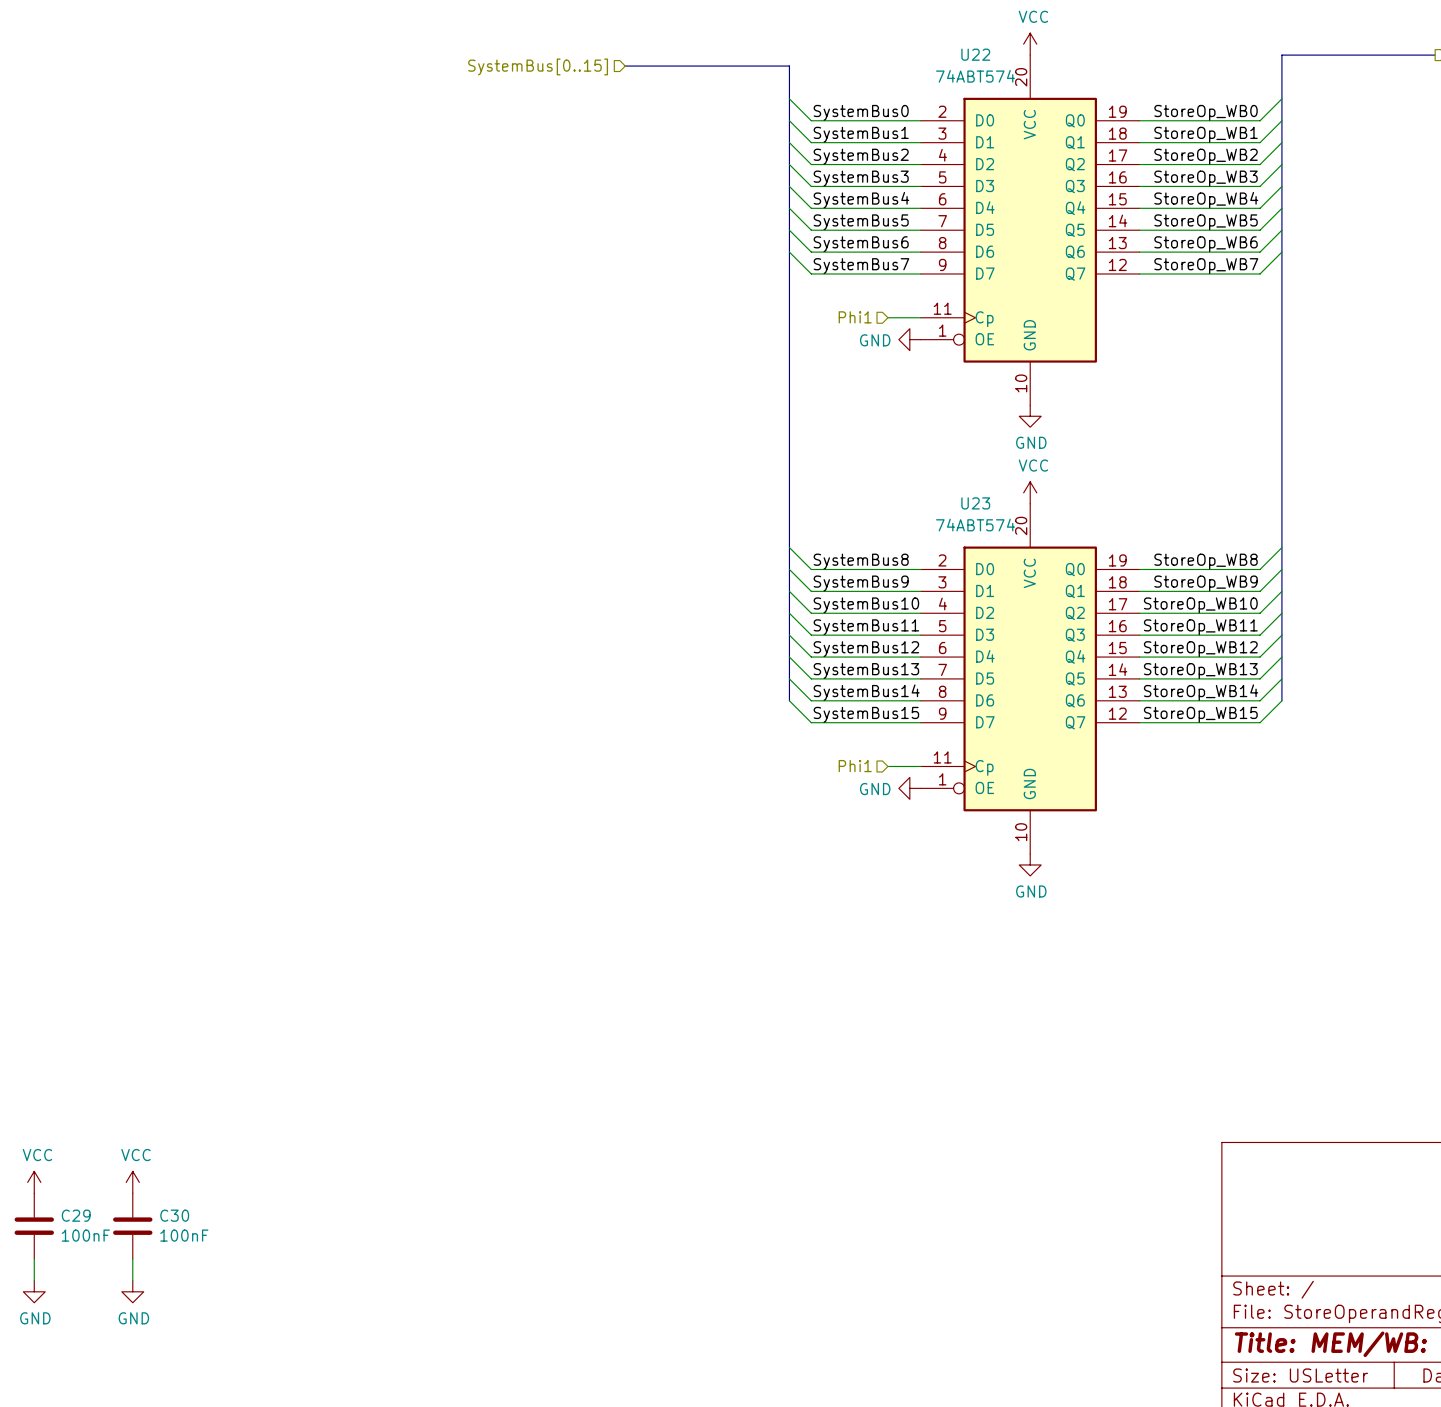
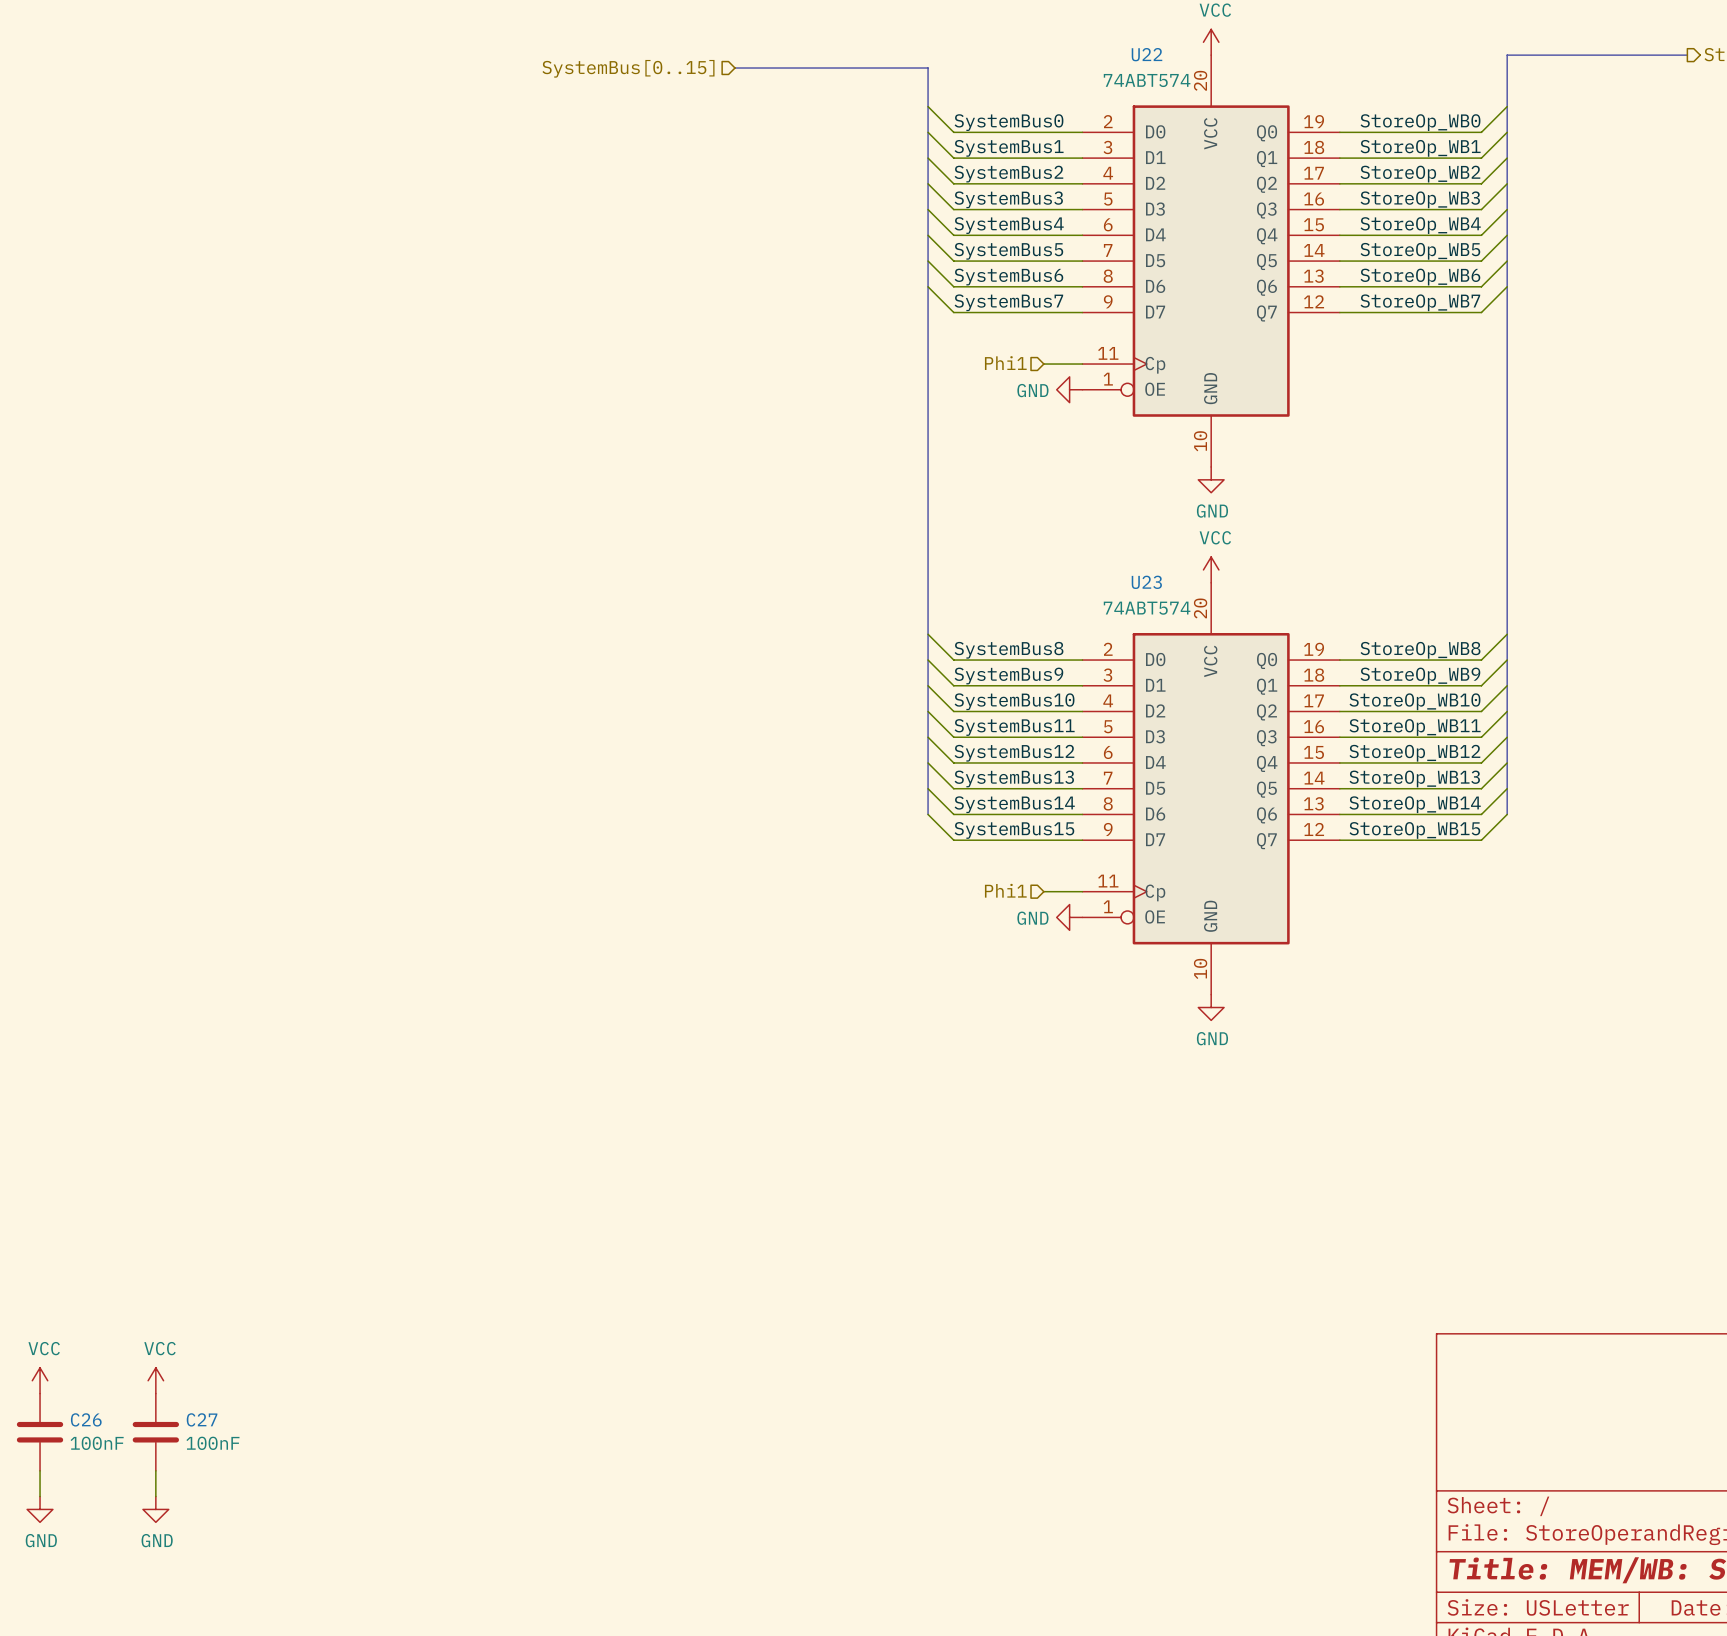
C29 name: C29 (76, 1215) -> C26 (86, 1419)
C30 name: C30 (174, 1215) -> C27 (202, 1419)

